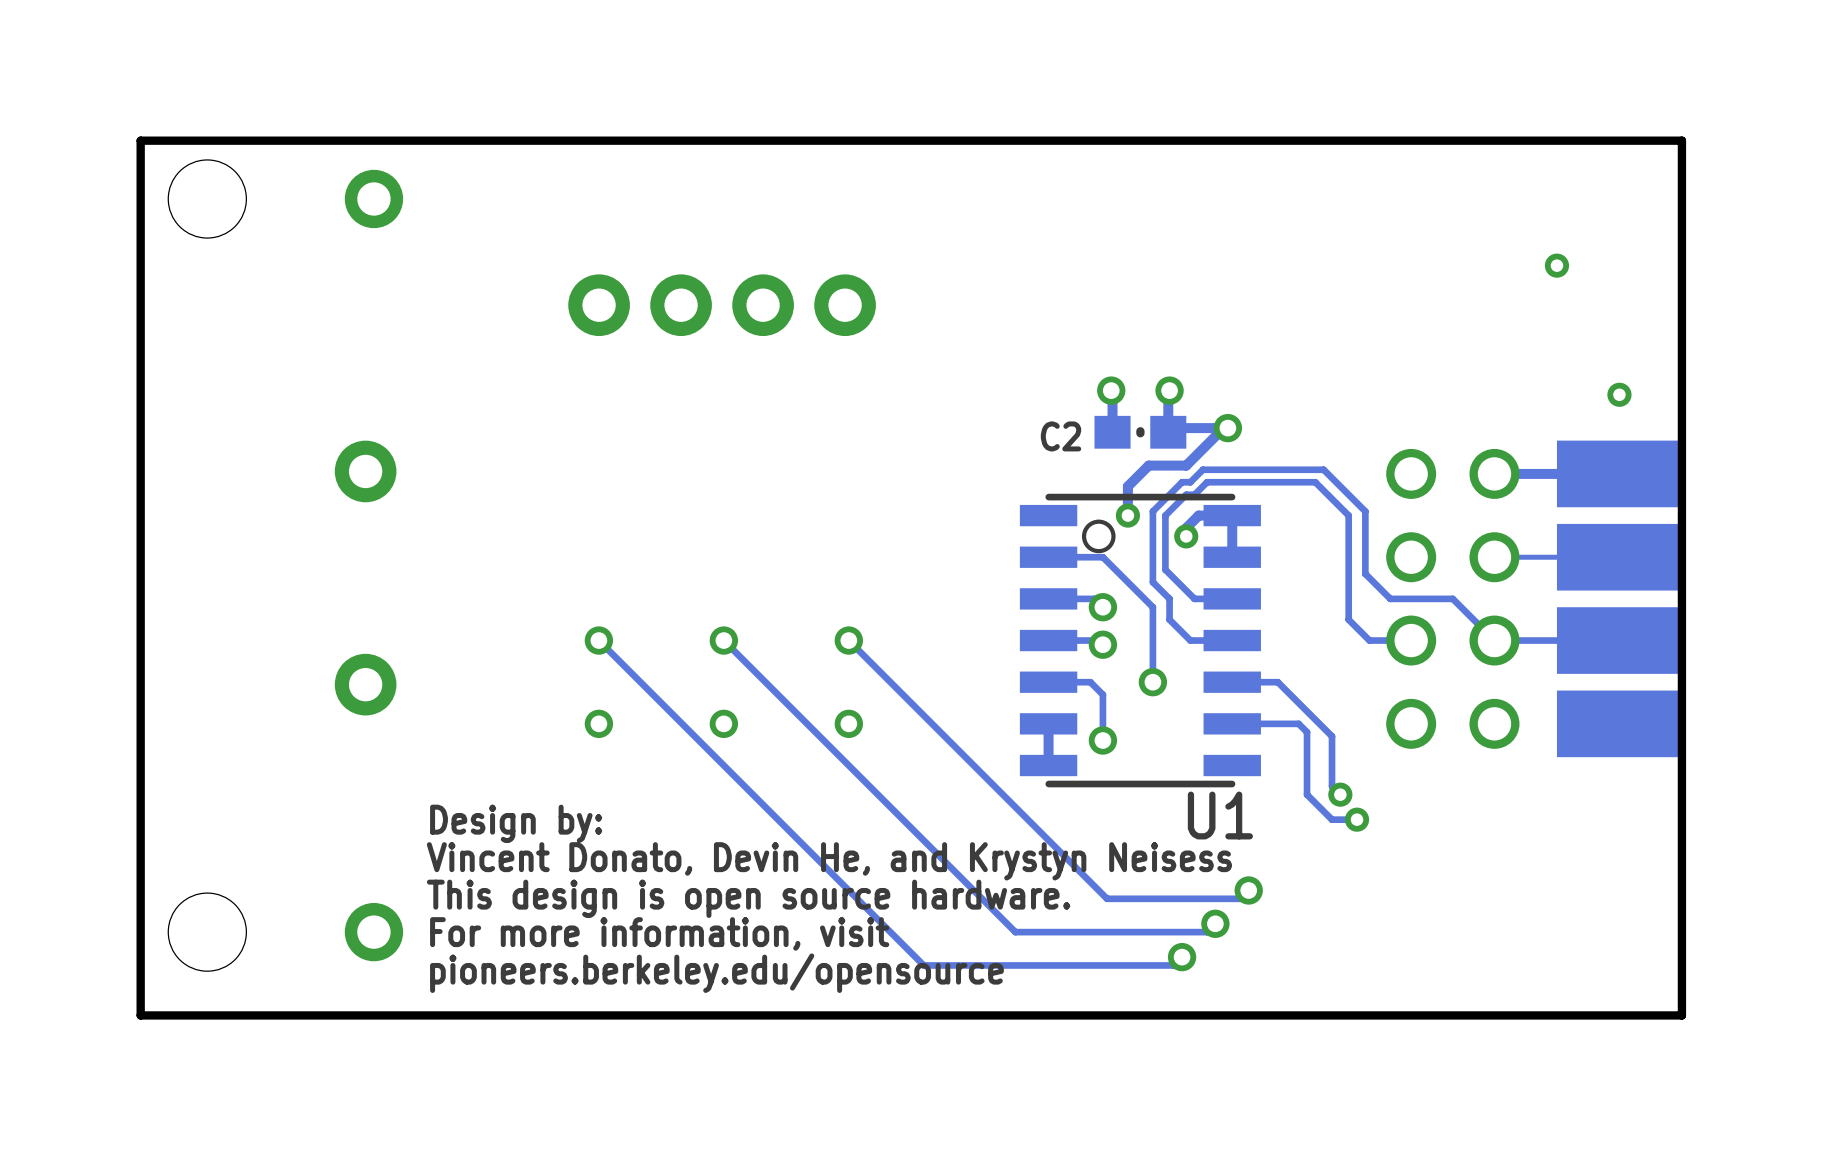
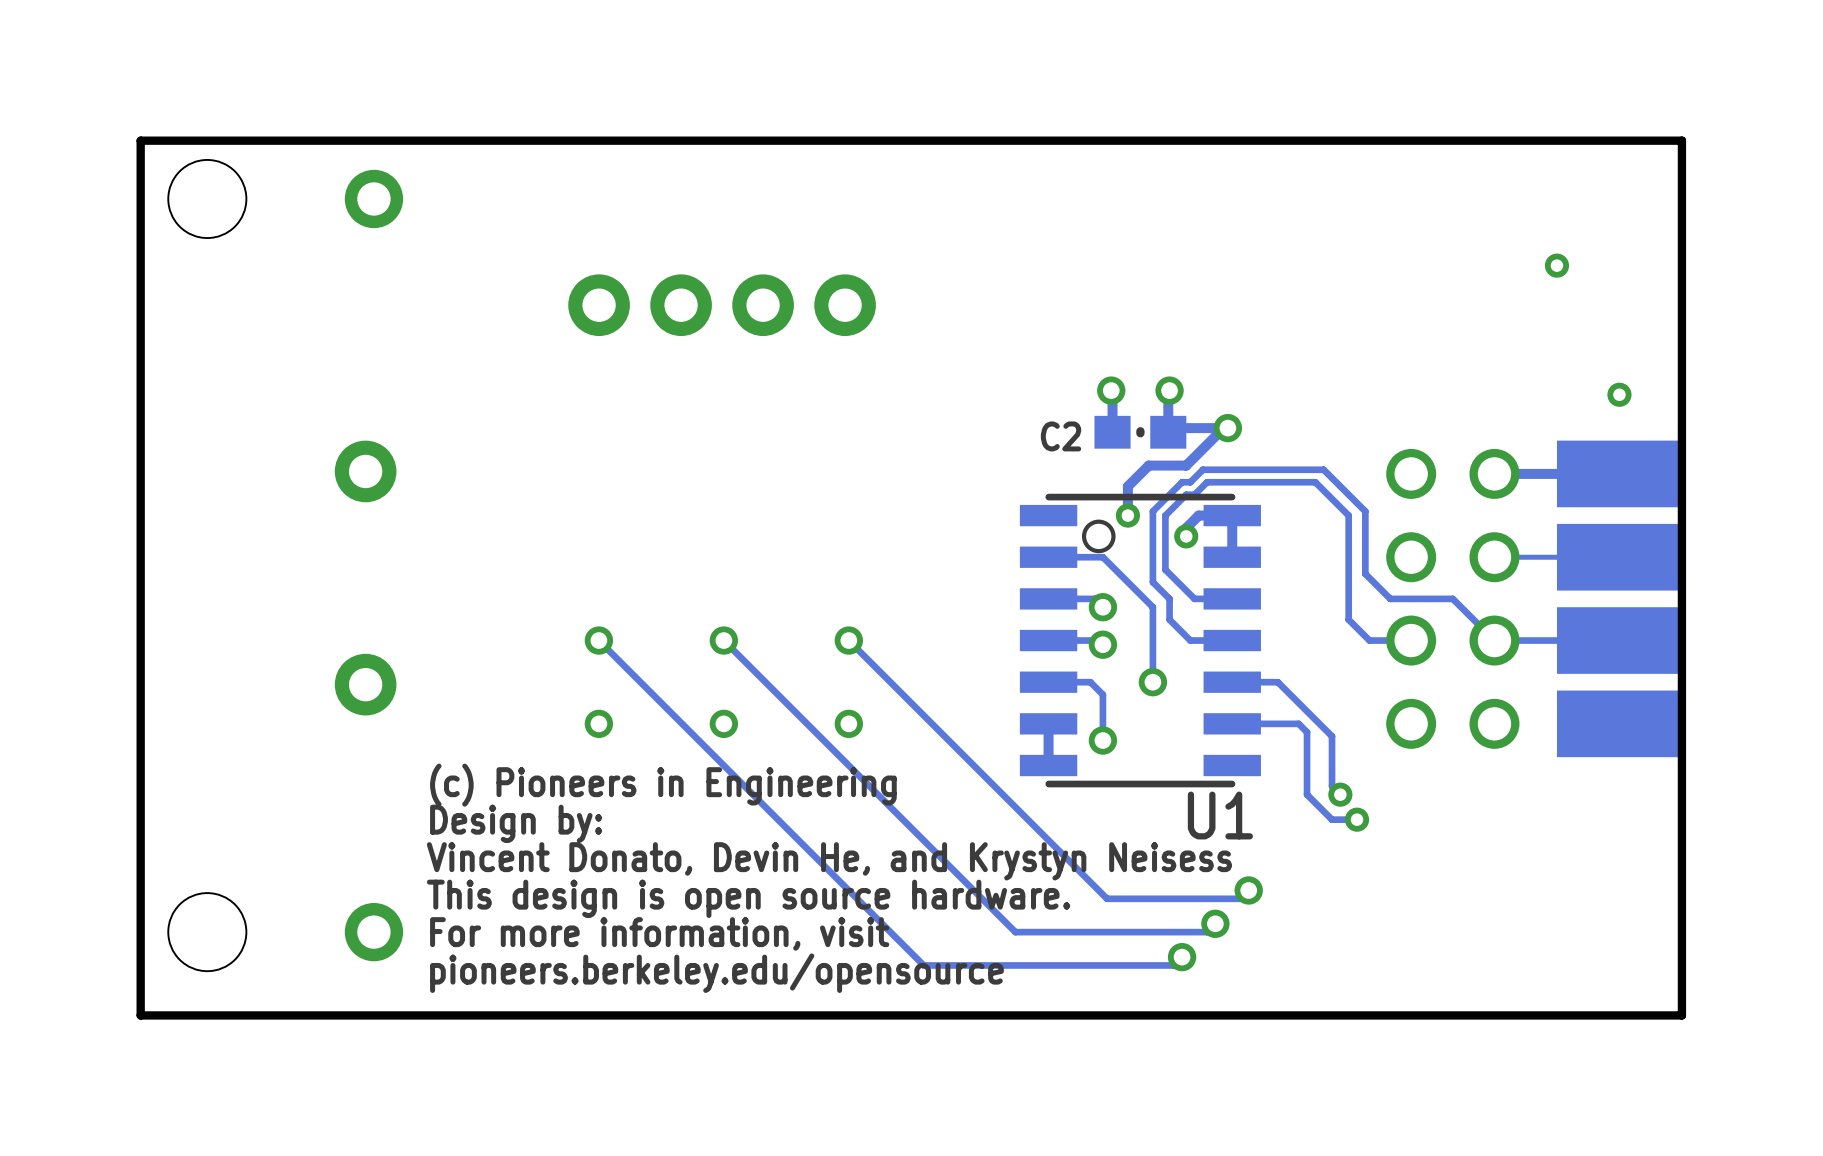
text: none -> (c) Pioneers in Engineering (663, 785)

